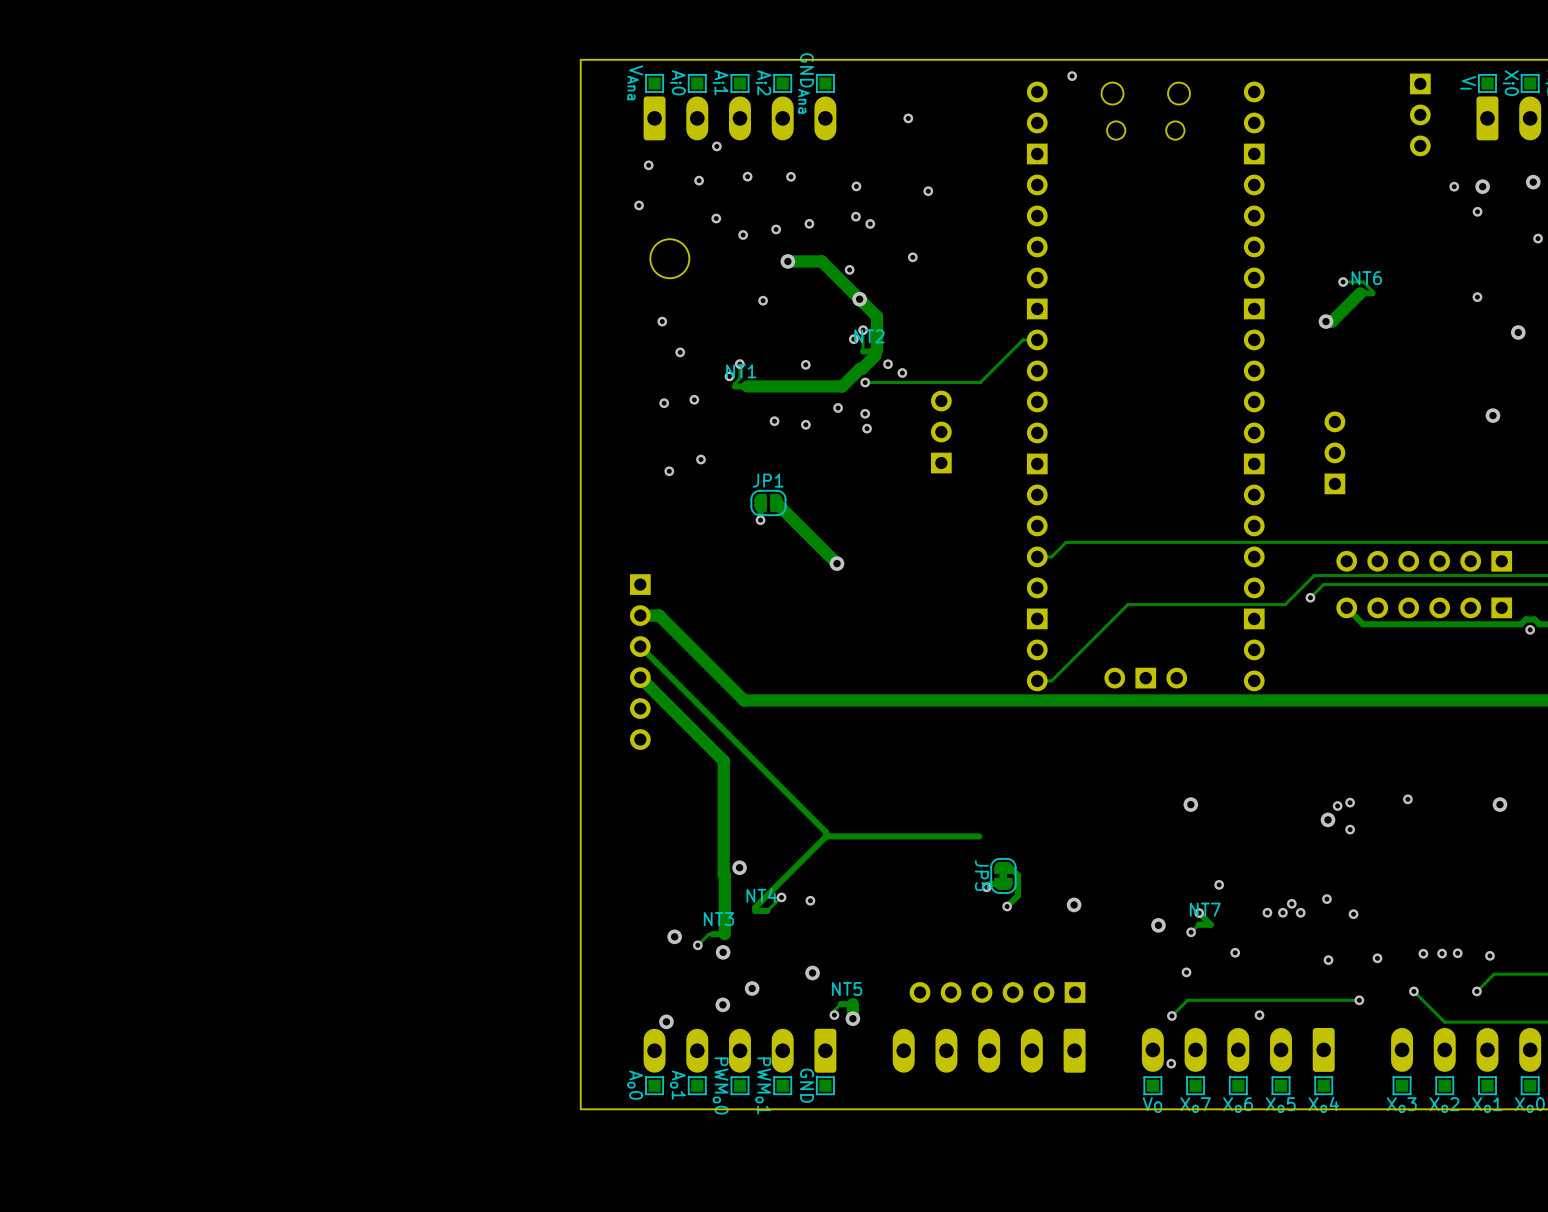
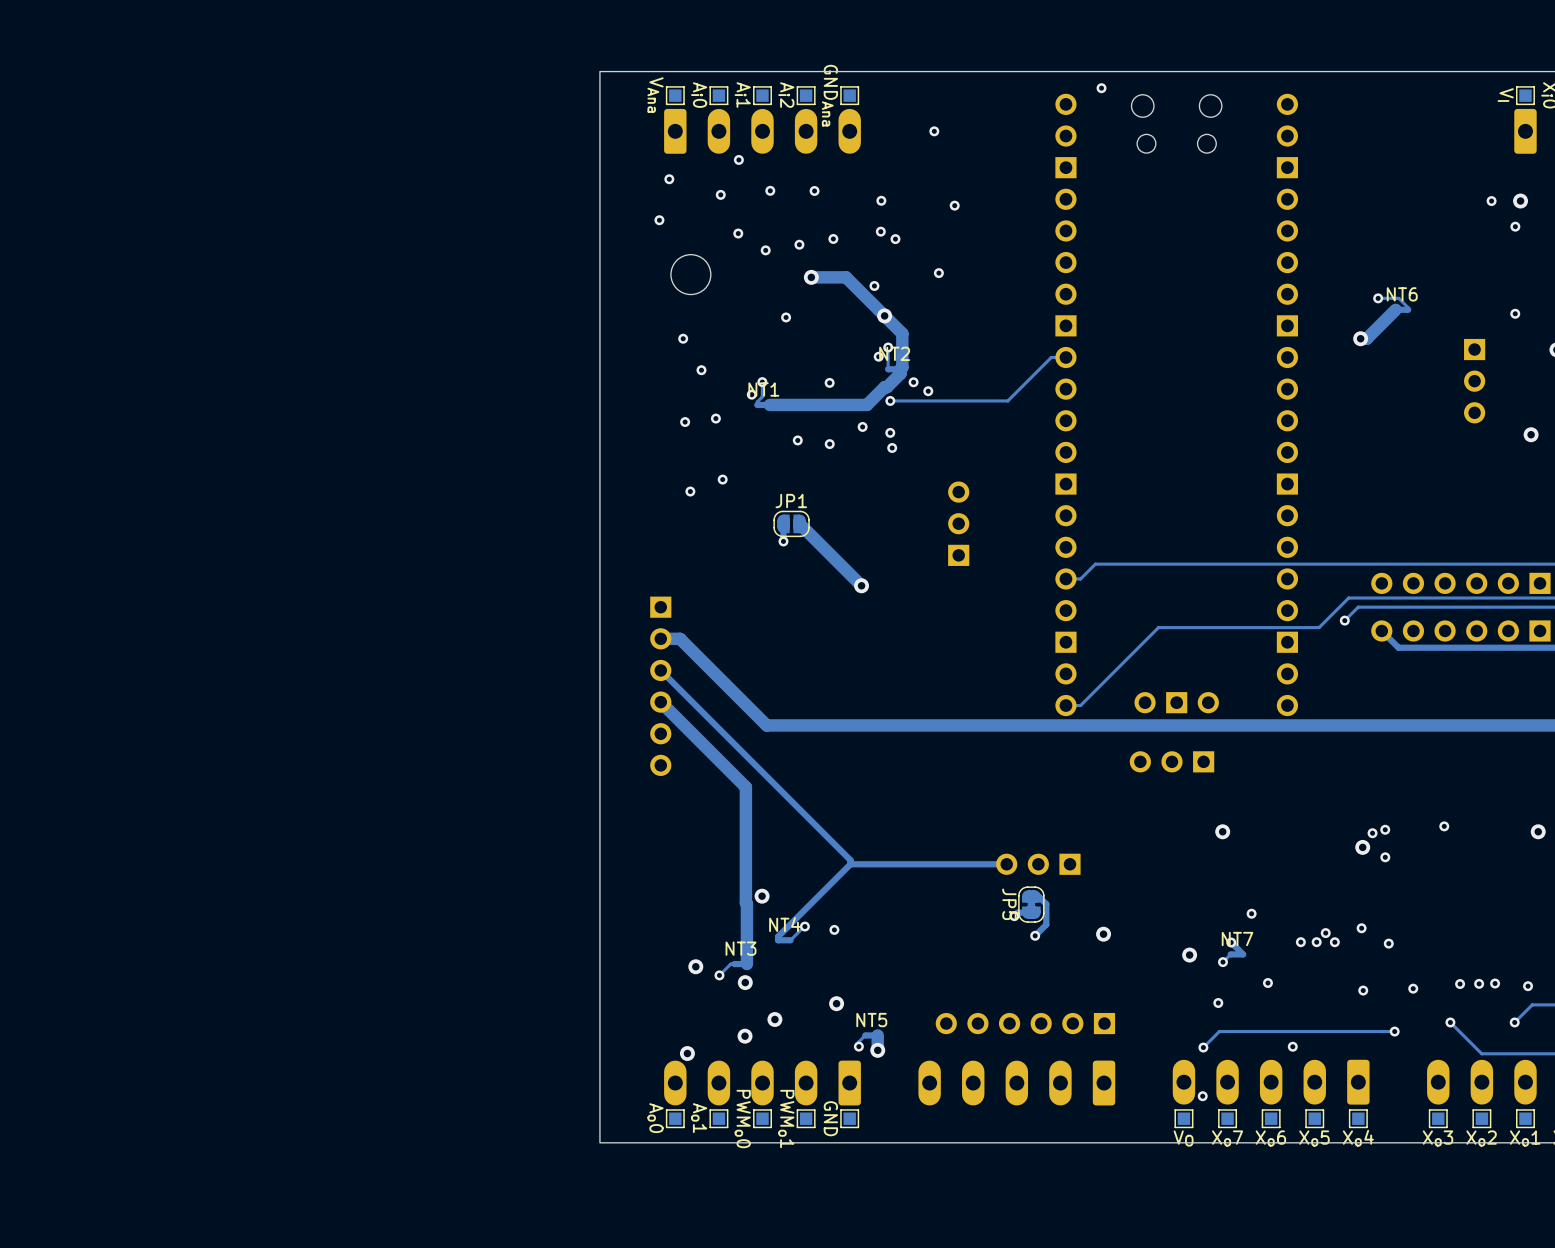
part: (1420, 114) -> none
part: none -> (1474, 381)
part position: (941, 432) -> (958, 523)
part: (1334, 452) -> none
part: none -> (1172, 761)
part: none -> (1038, 864)

